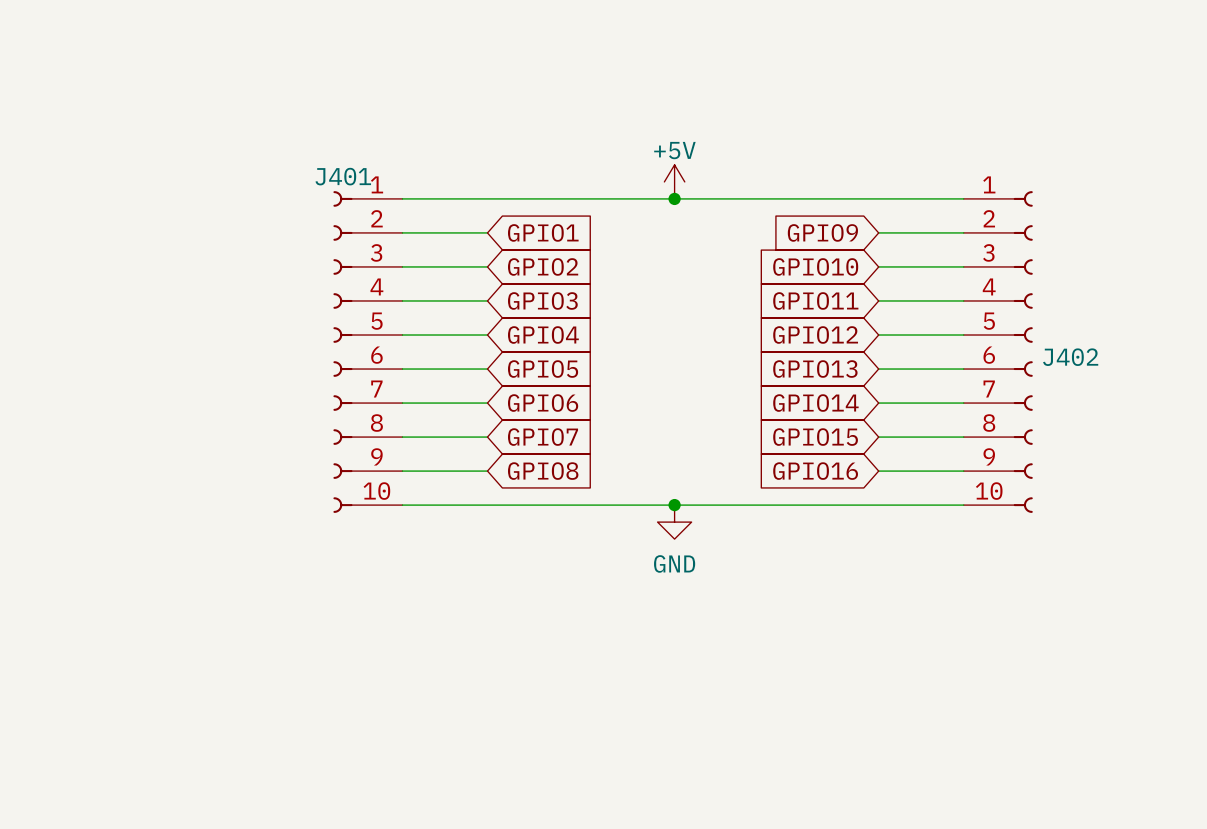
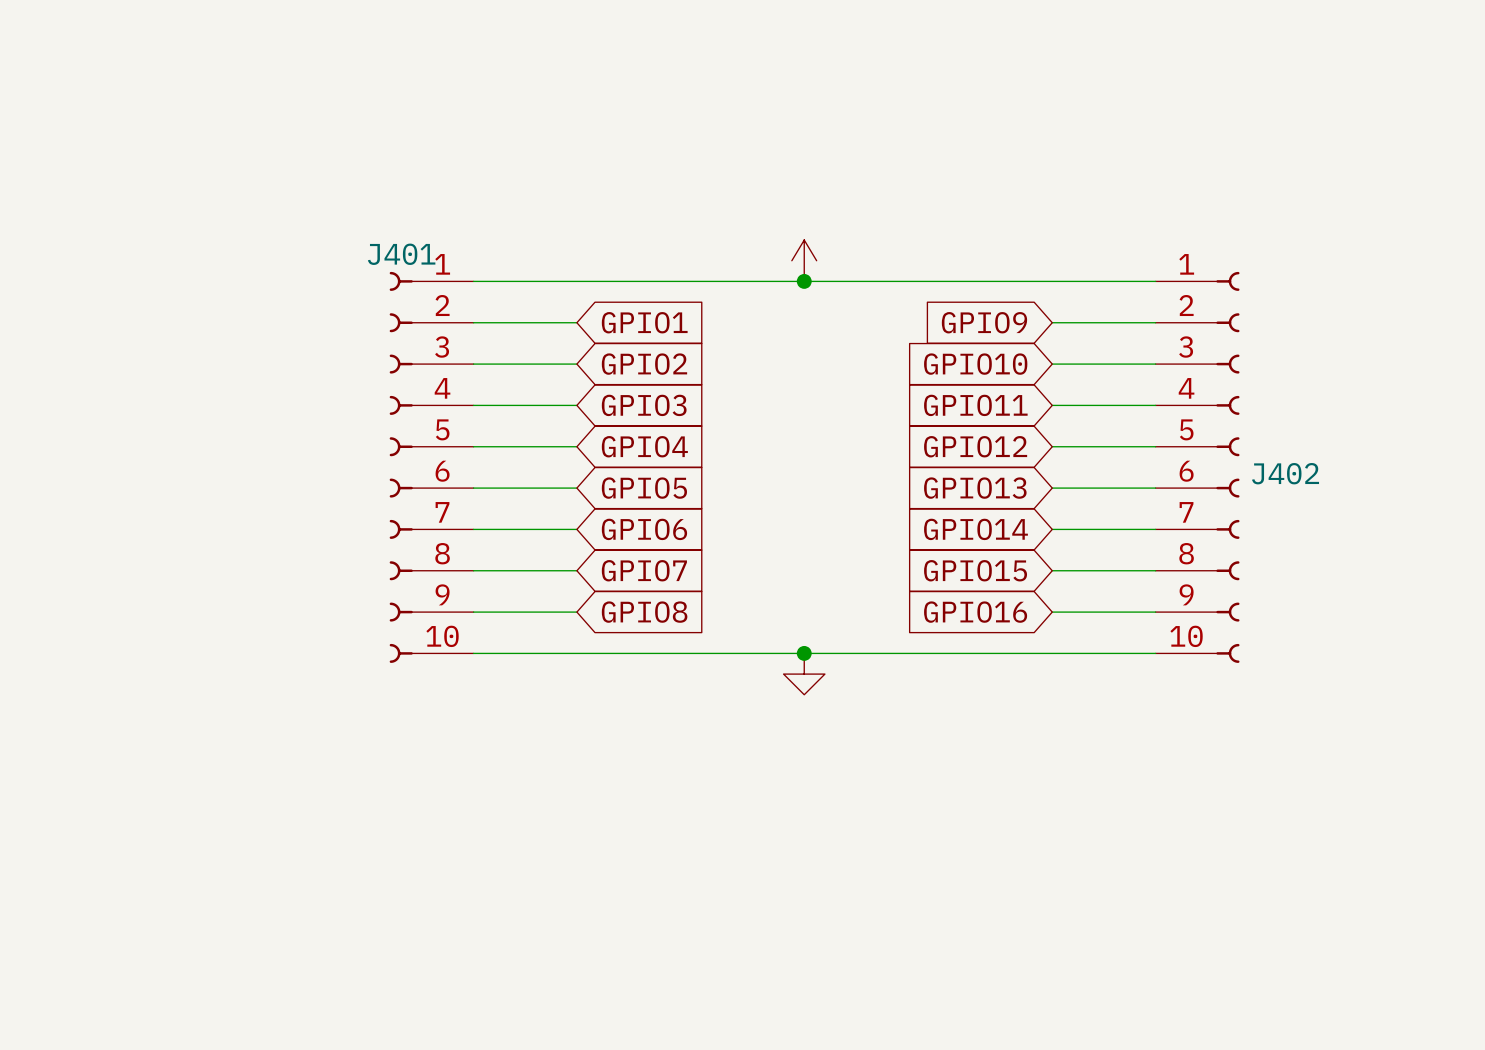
power symbol text: +5V (674, 150) -> none
power symbol text: GND (674, 563) -> none

